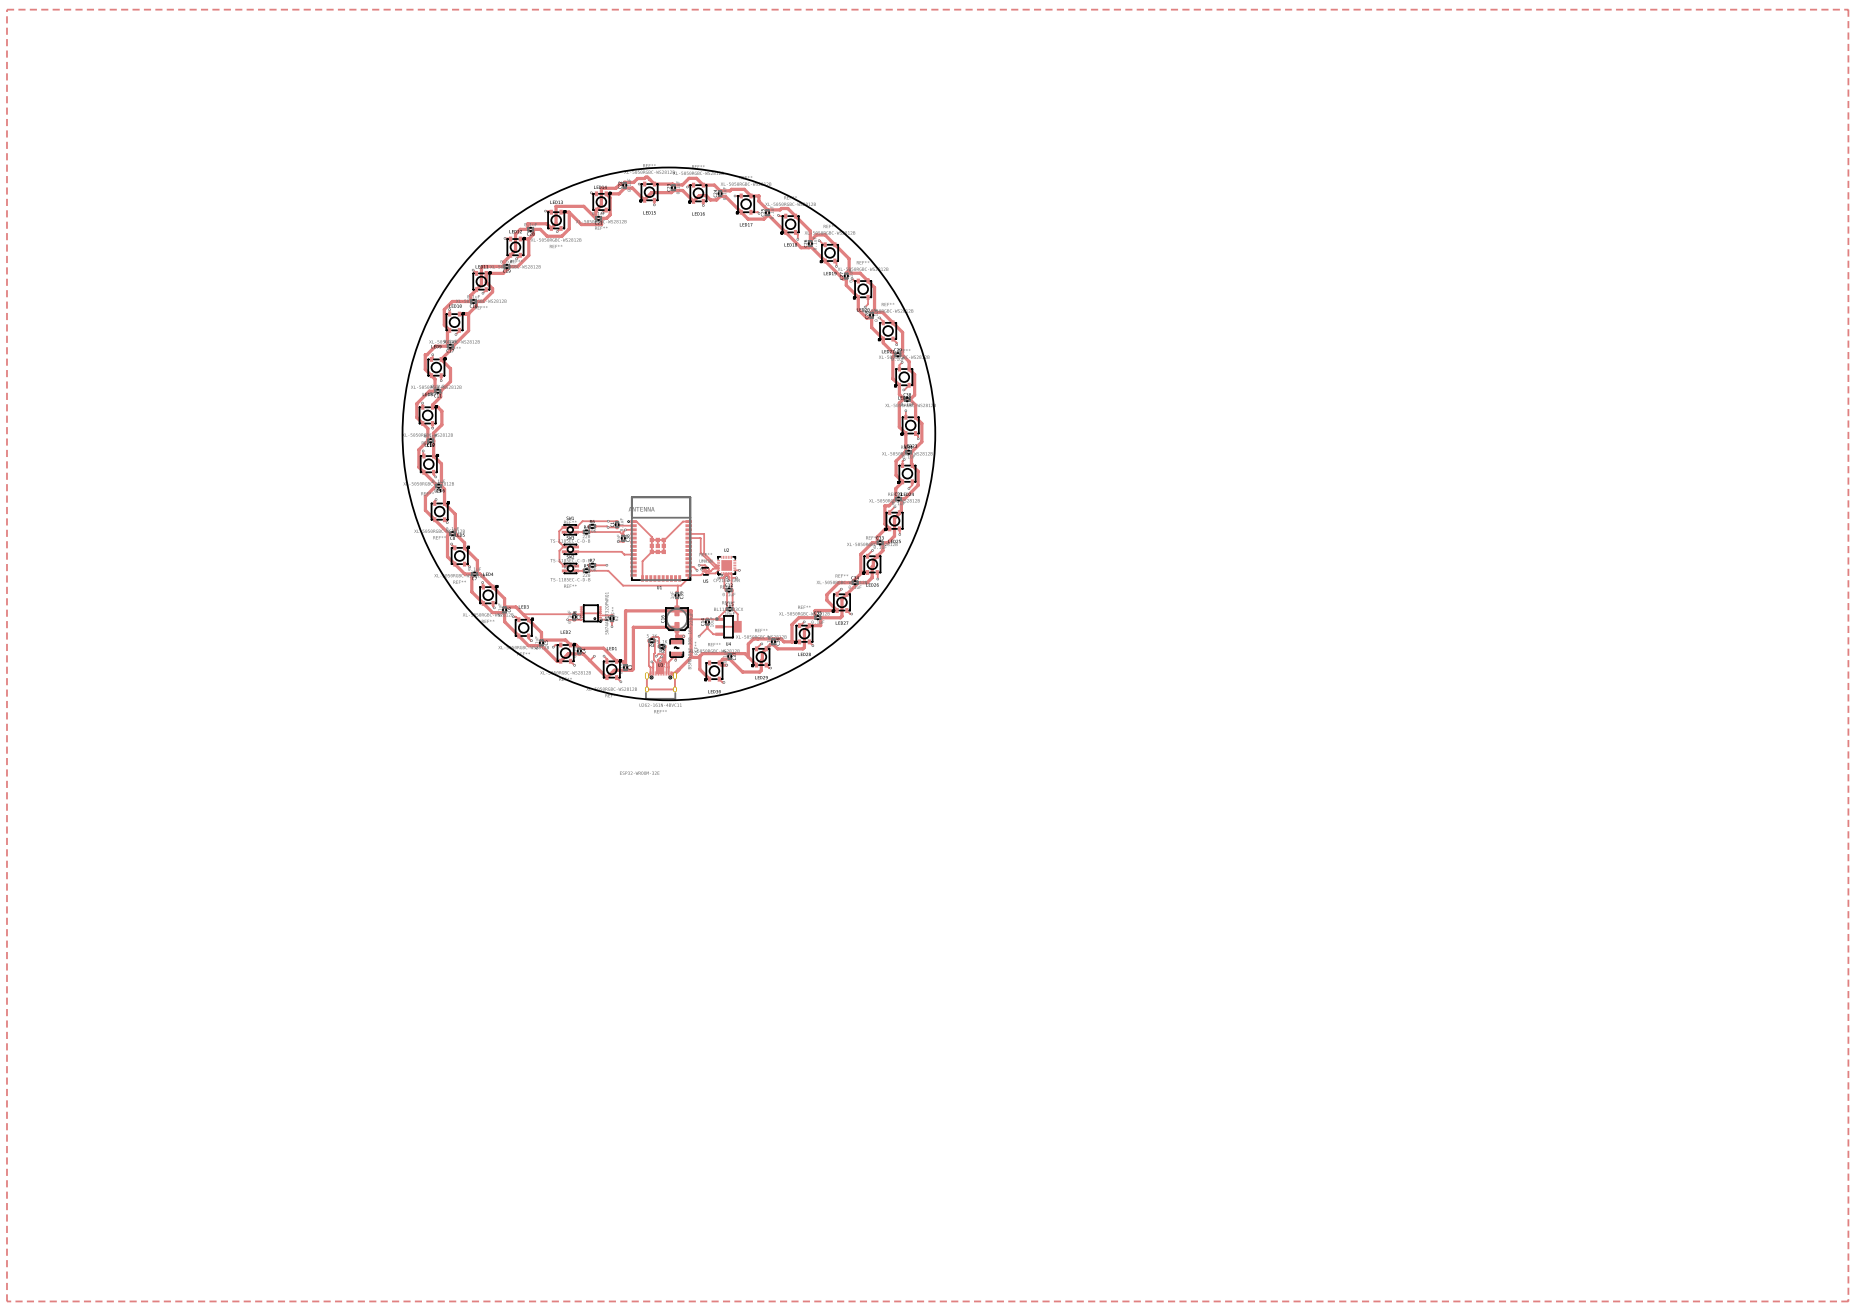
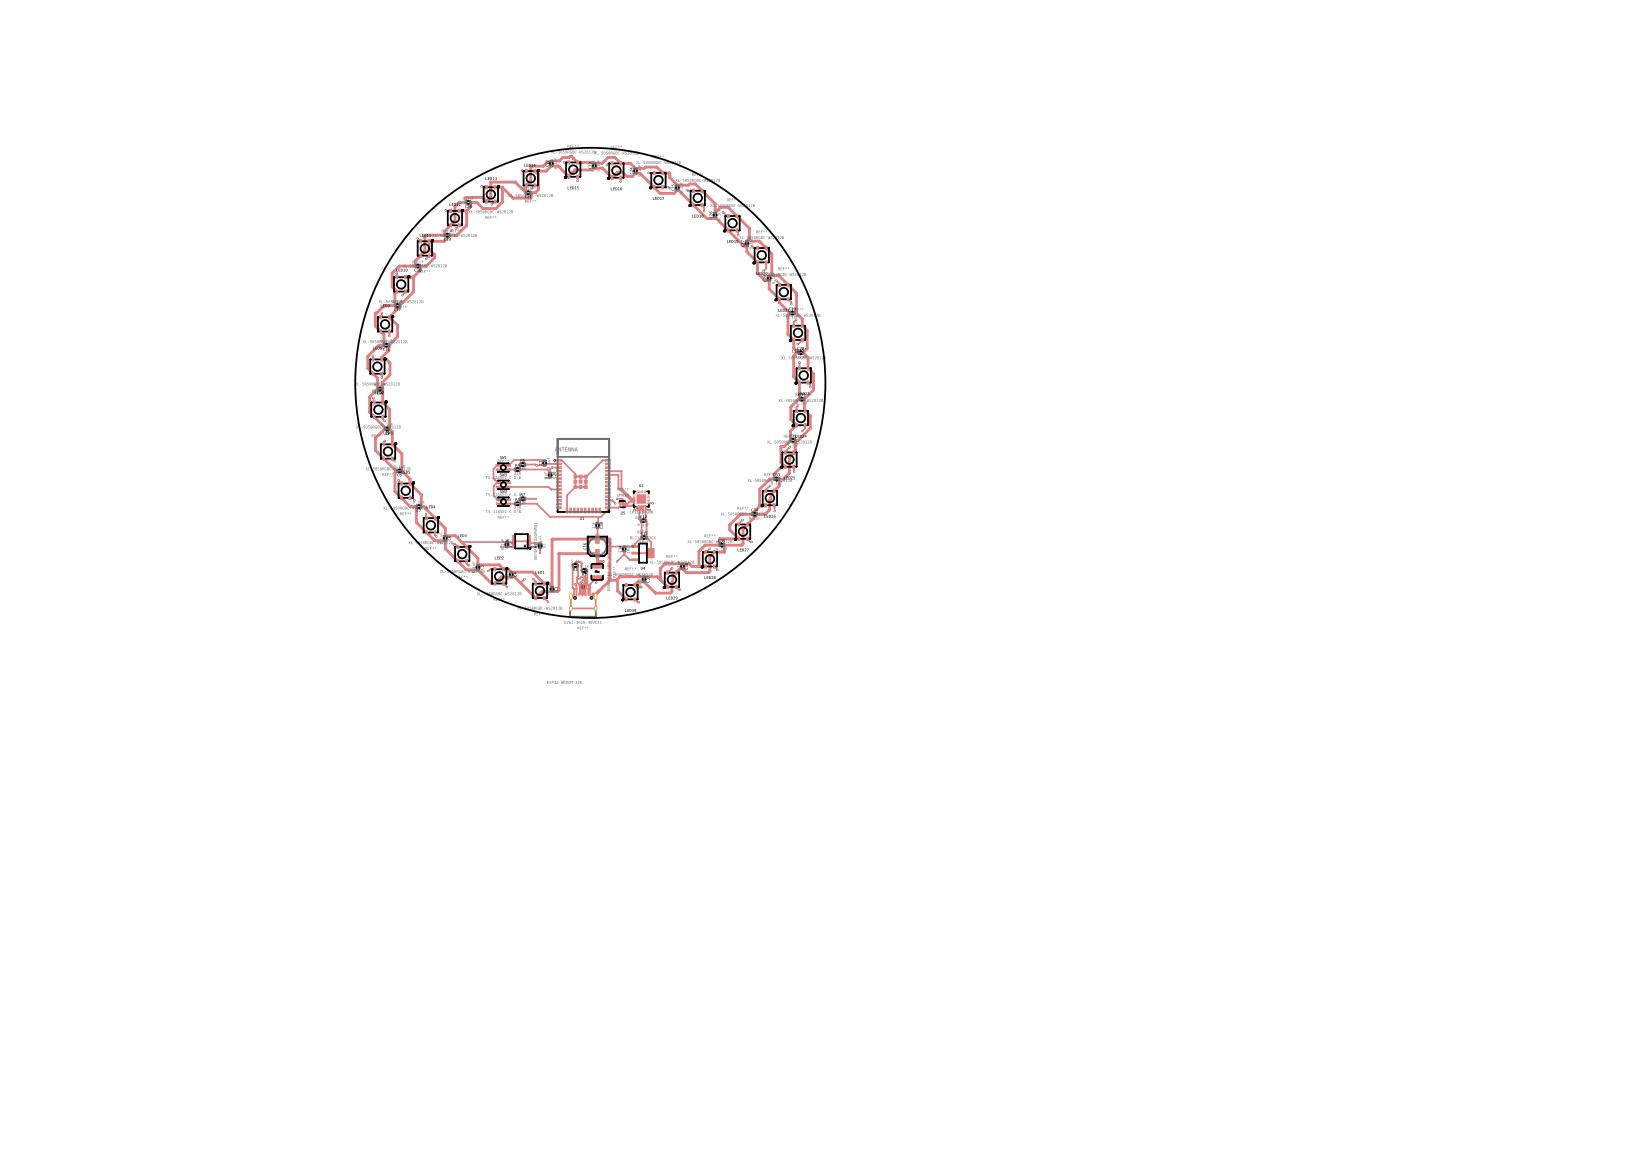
zone outline: (6, 9) (6, 1301) (1848, 1301) (1848, 9) (6, 9) -> none

